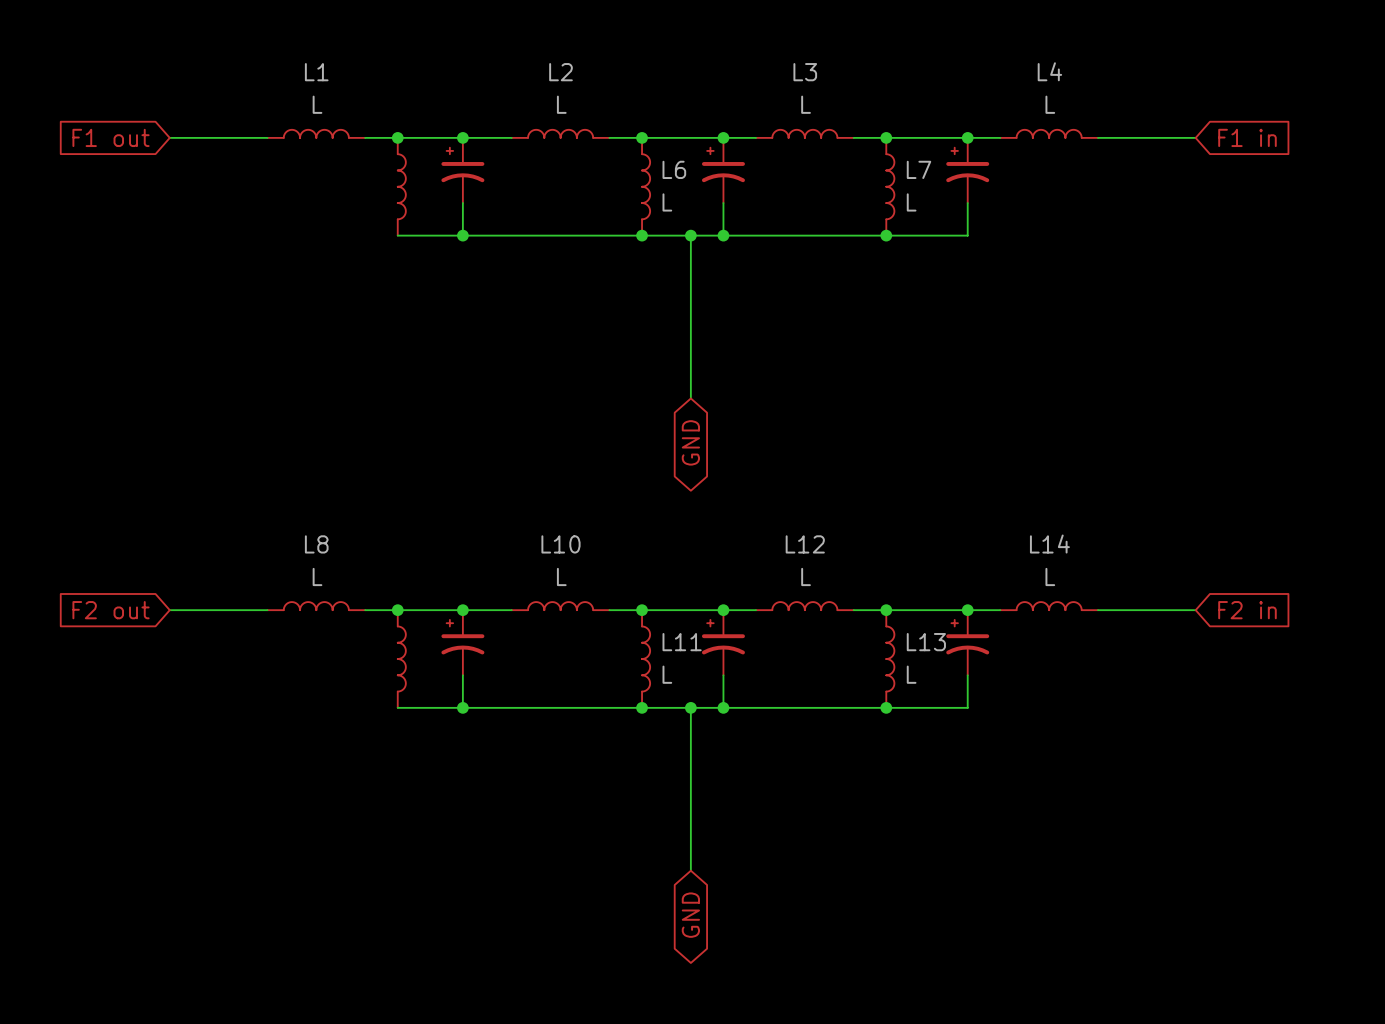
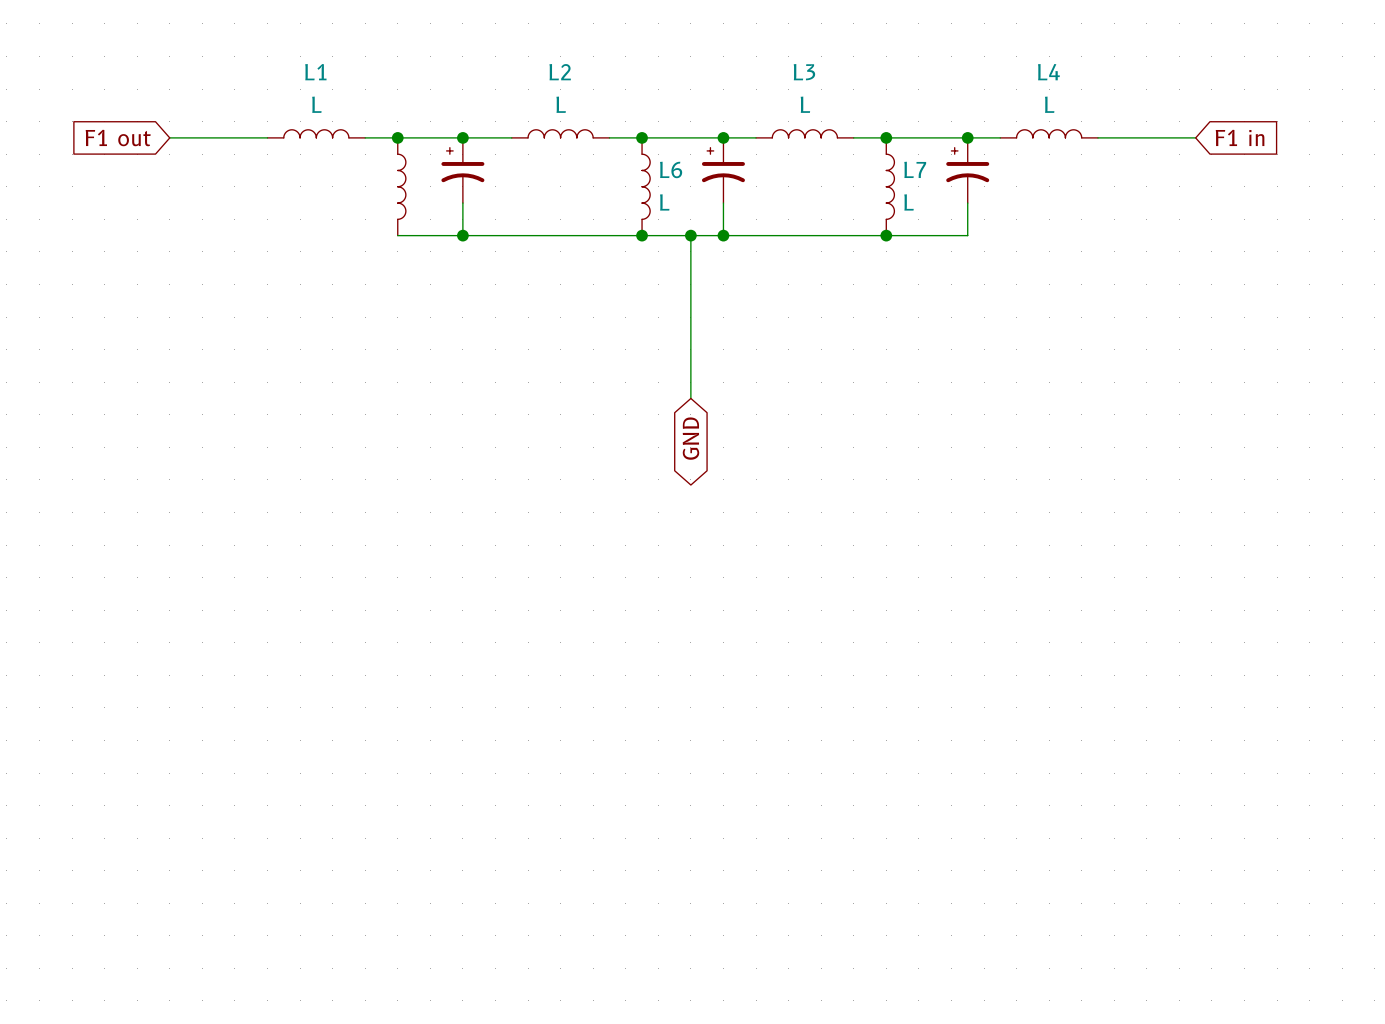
L8: L (316, 606) -> none
L10: L (560, 606) -> none
L12: L (804, 606) -> none
L14: L (1049, 606) -> none
global label: F2 out (111, 610) -> none
wire: (169, 610) (267, 610) -> none
wire: (365, 610) (511, 610) -> none
junction: (397, 610) -> none
junction: (462, 610) -> none
wire: (609, 610) (756, 610) -> none
junction: (642, 610) -> none
junction: (723, 610) -> none
wire: (853, 610) (1000, 610) -> none
junction: (886, 610) -> none
junction: (967, 610) -> none
wire: (1097, 610) (1195, 610) -> none
global label: F2 in (1247, 610) -> none
part: (462, 642) -> none
part: (723, 642) -> none
part: (967, 642) -> none
part: (401, 659) -> none
L11: L (646, 659) -> none
L13: L (890, 659) -> none
wire: (462, 675) (462, 707) -> none
wire: (723, 675) (723, 707) -> none
wire: (967, 675) (967, 707) (397, 707) -> none
junction: (462, 707) -> none
junction: (642, 707) -> none
wire: (690, 707) (690, 870) -> none
junction: (690, 707) -> none
junction: (723, 707) -> none
junction: (886, 707) -> none
global label: GND (690, 915) -> none

